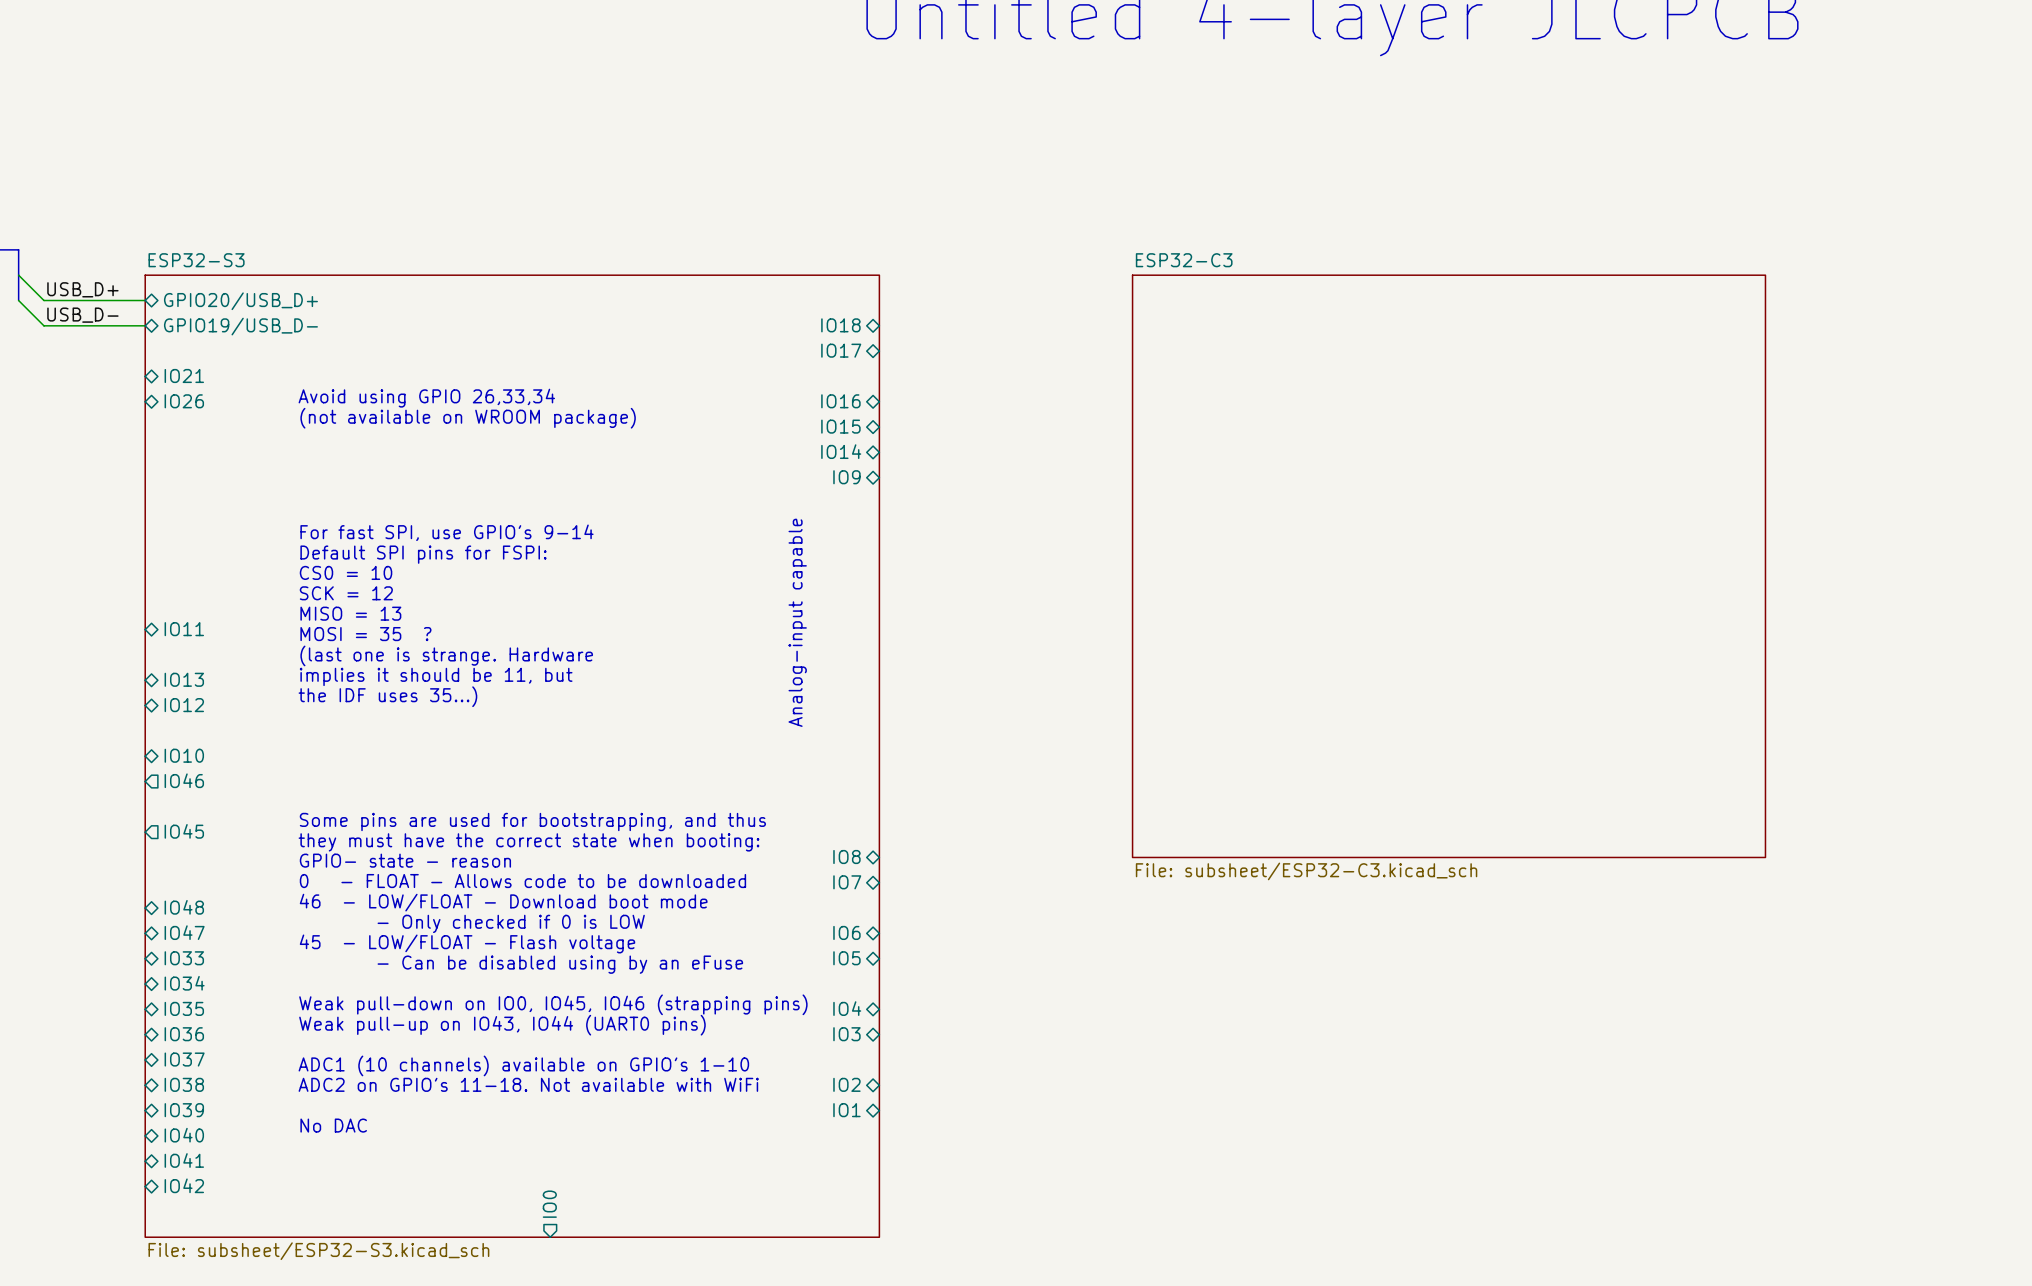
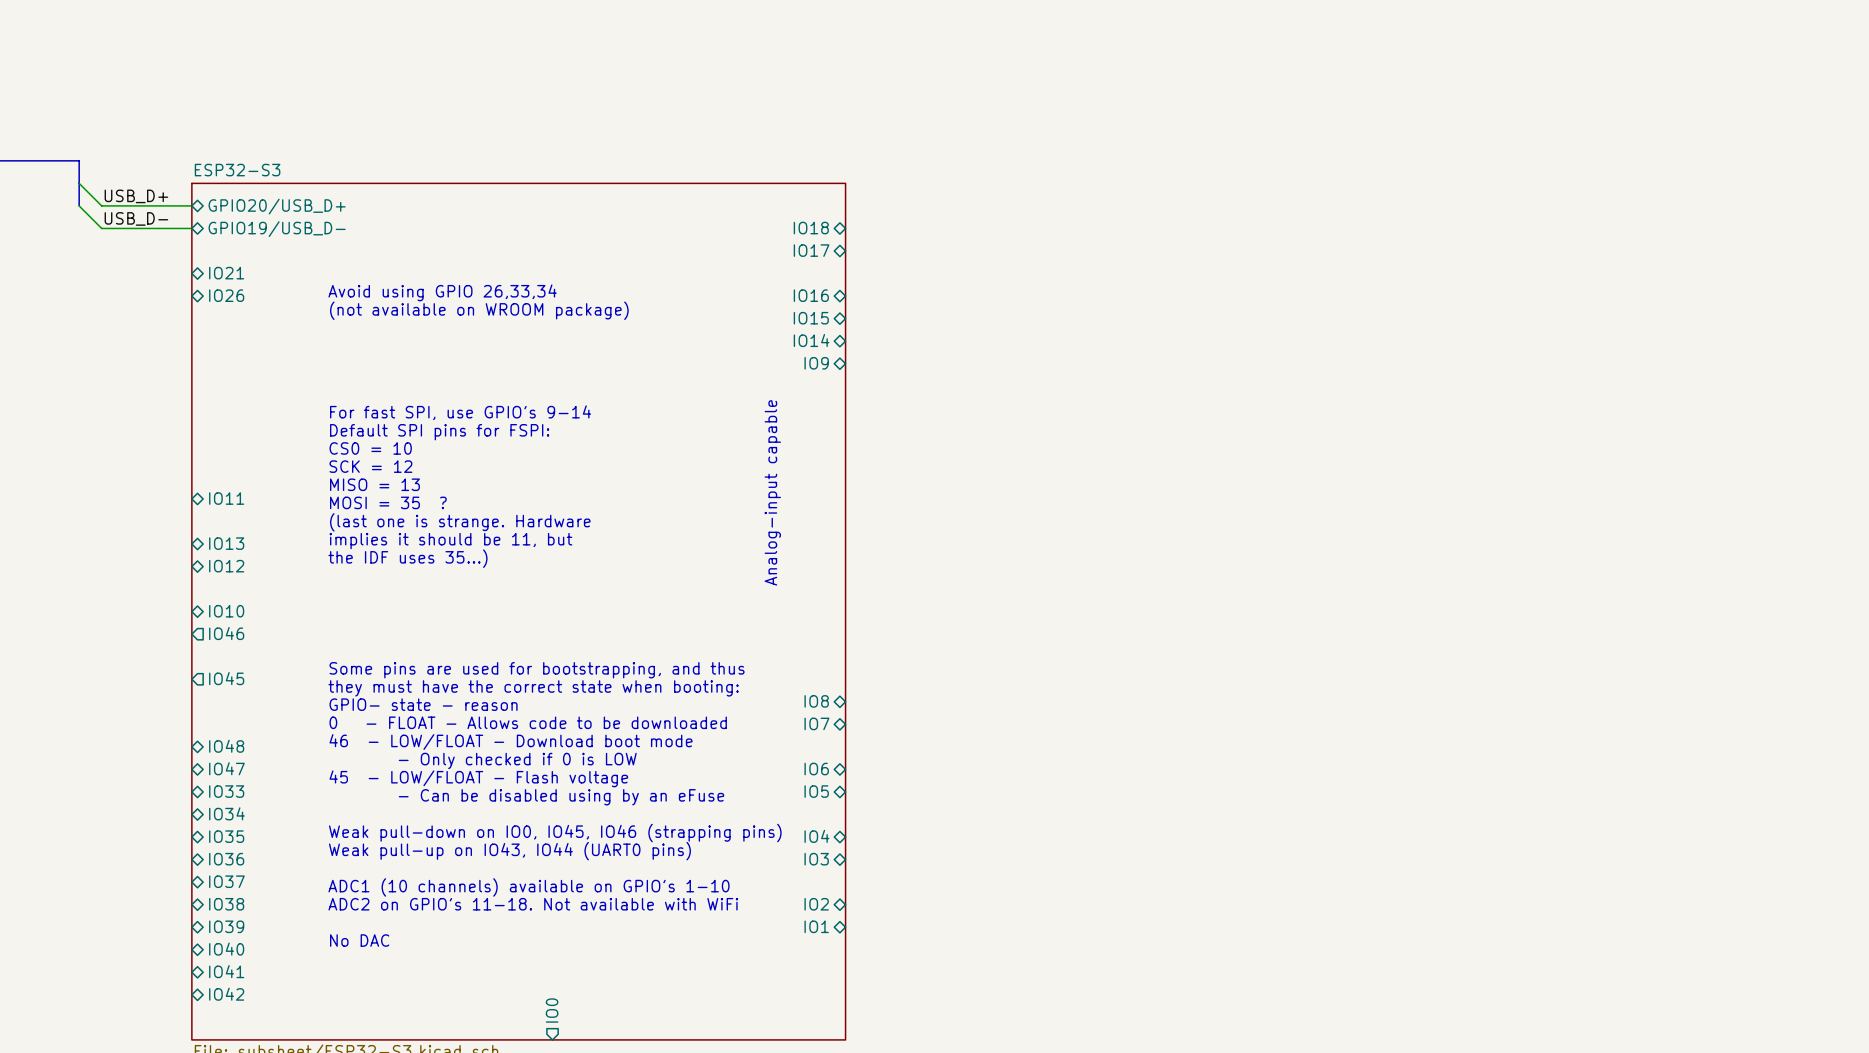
sheet ESP32-C3: File: subsheet/ESP32-C3.kicad_sch (1449, 566) -> none

